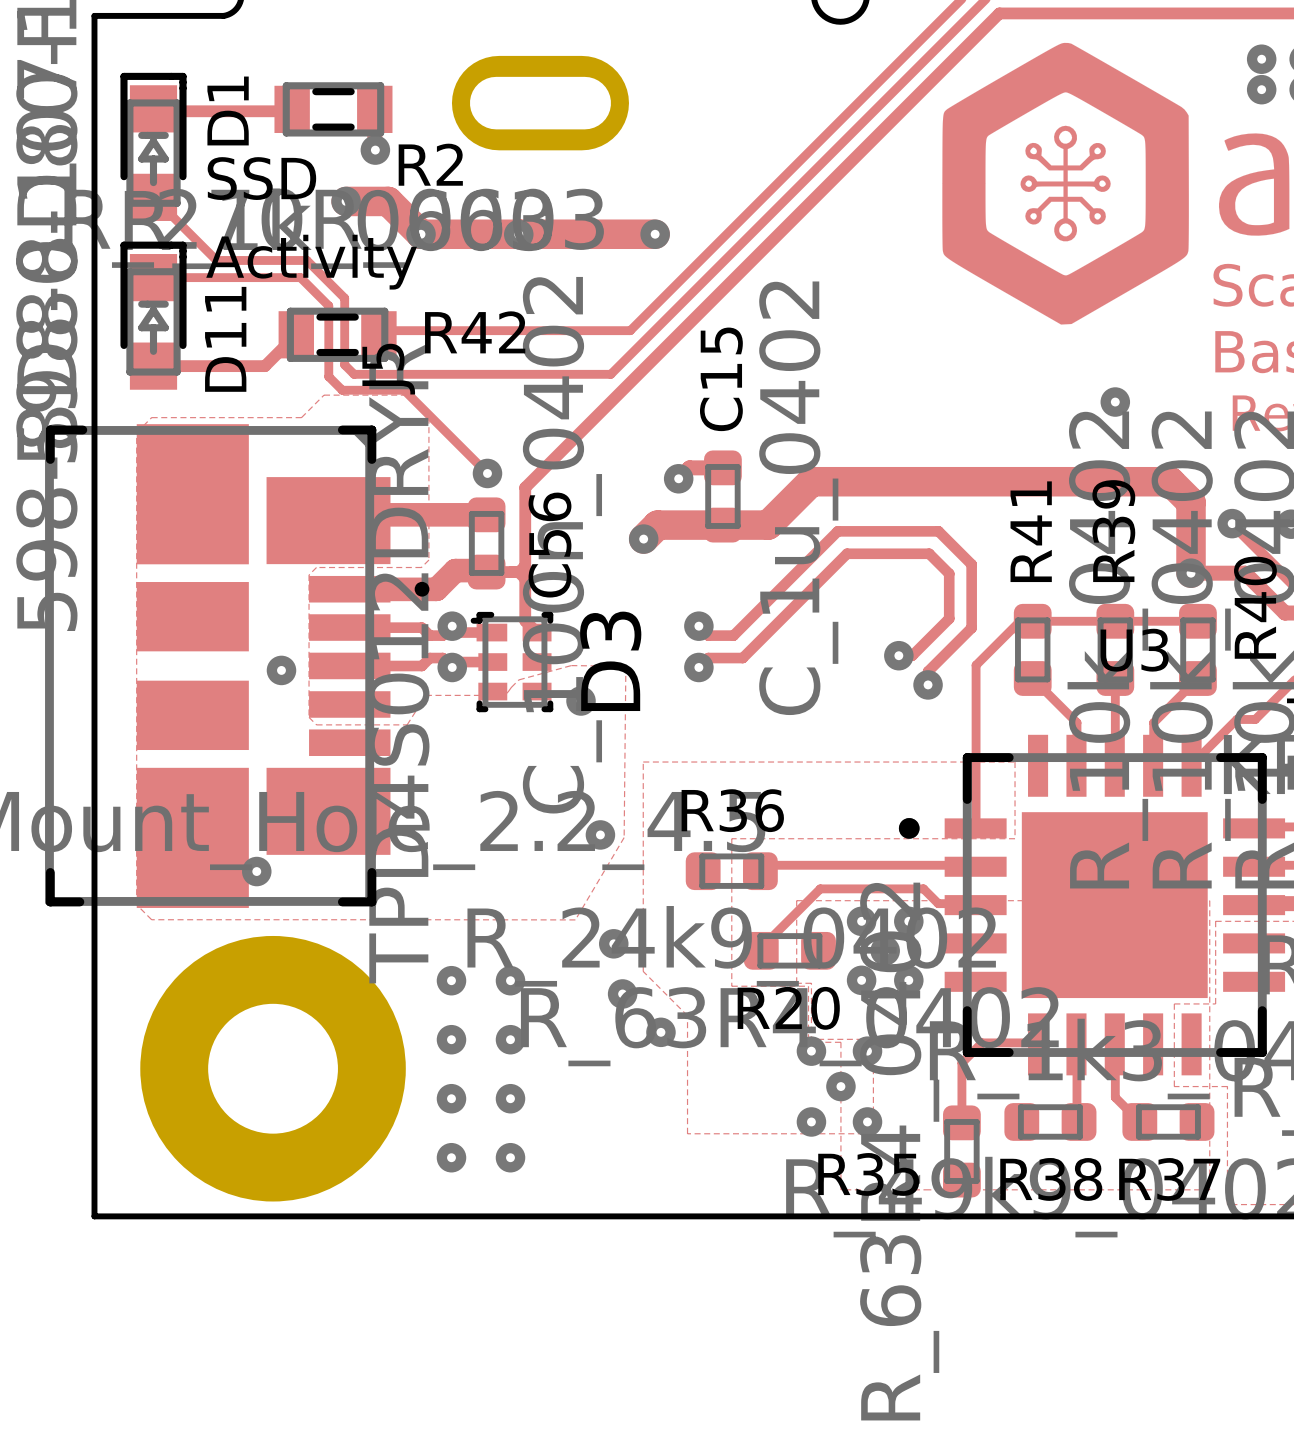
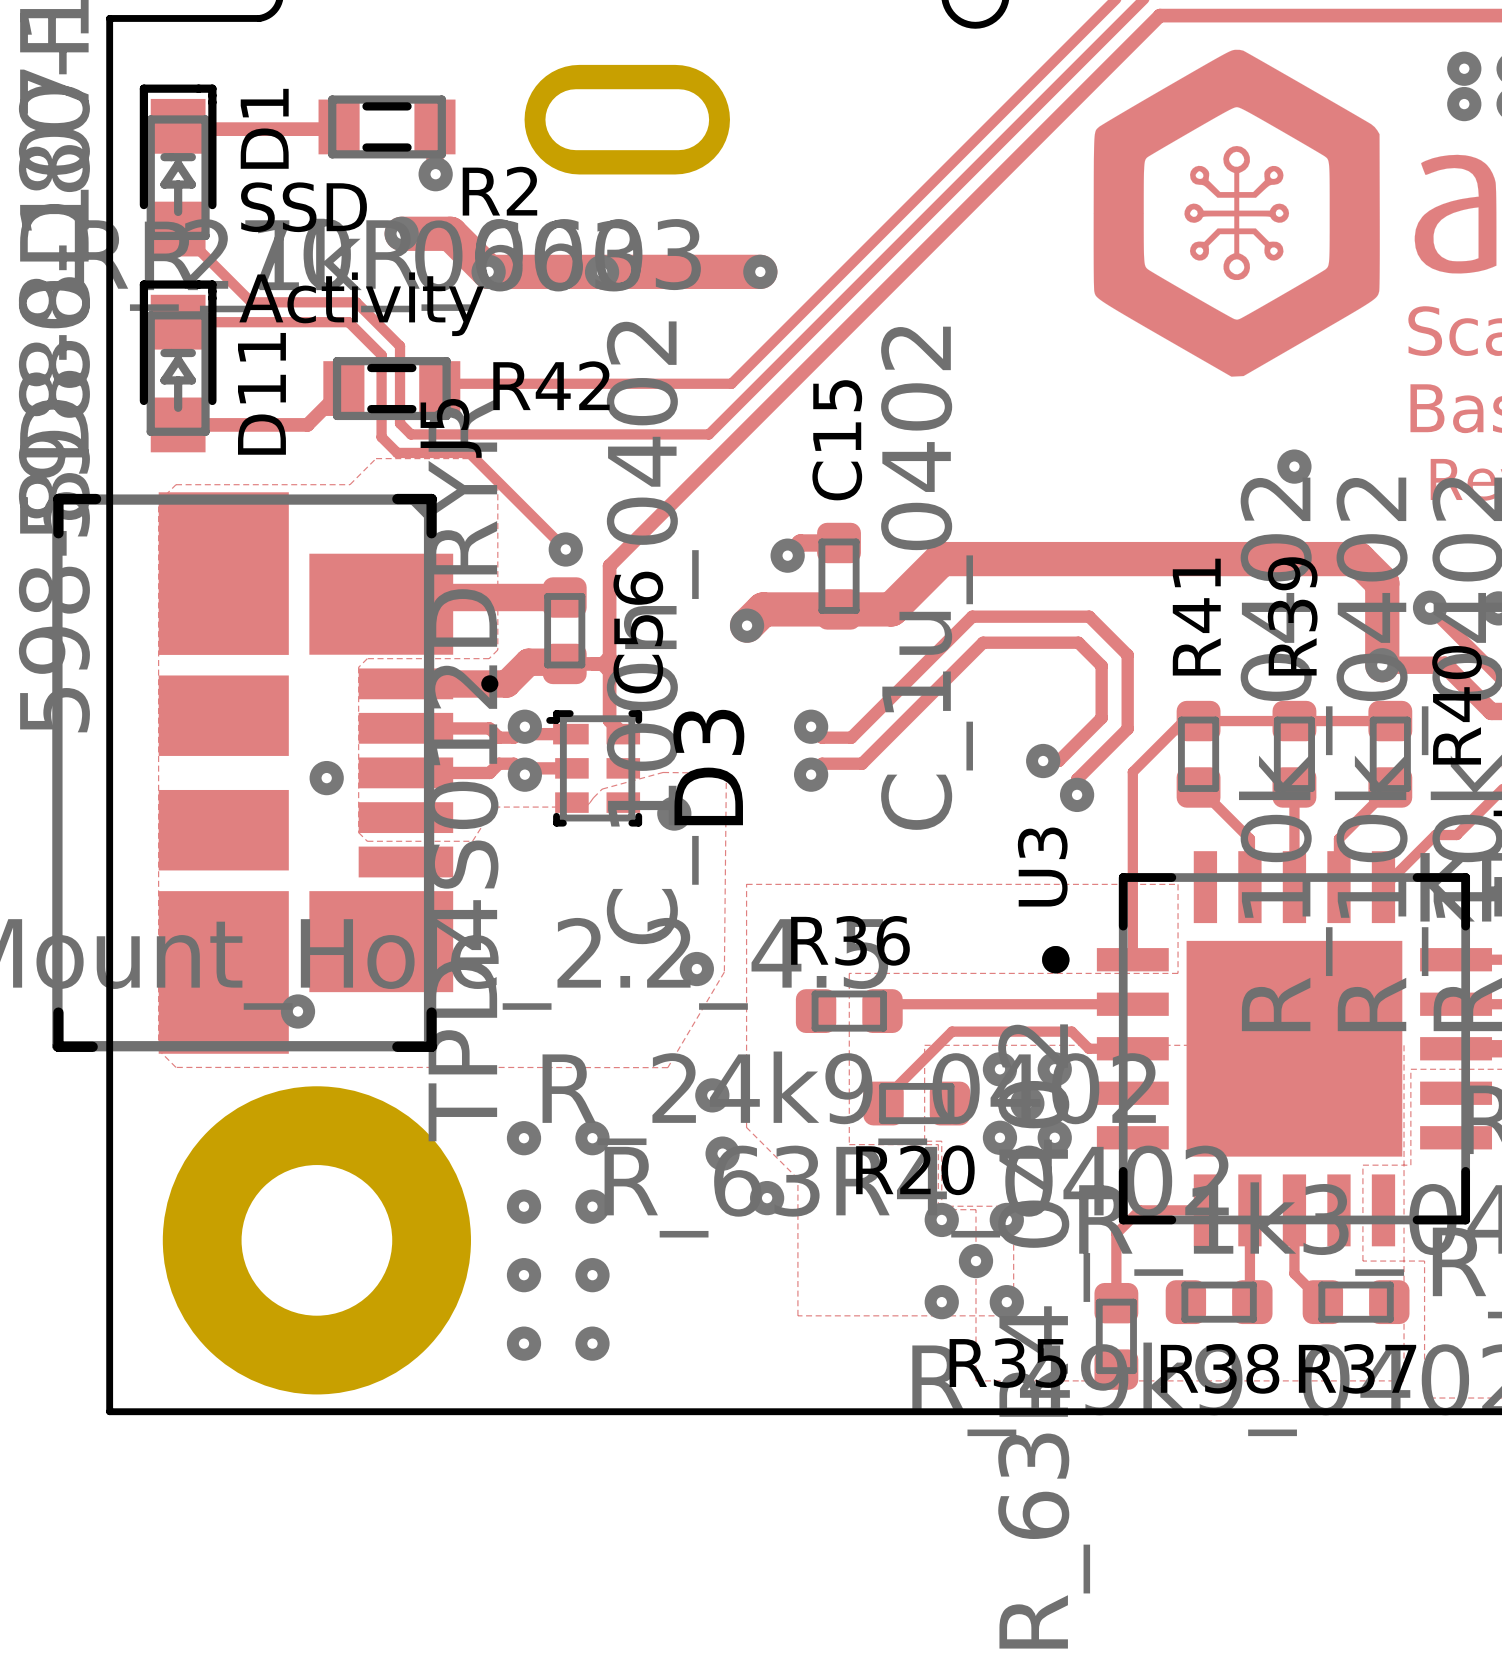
U3 name rotation: 0° (1134, 650) -> 90° counterclockwise (1042, 867)
U3 name position: U3 (1134, 650) -> U3 (1042, 867)
U3 footprint: [898, 734, 1286, 1076] -> [1042, 851, 1493, 1247]

